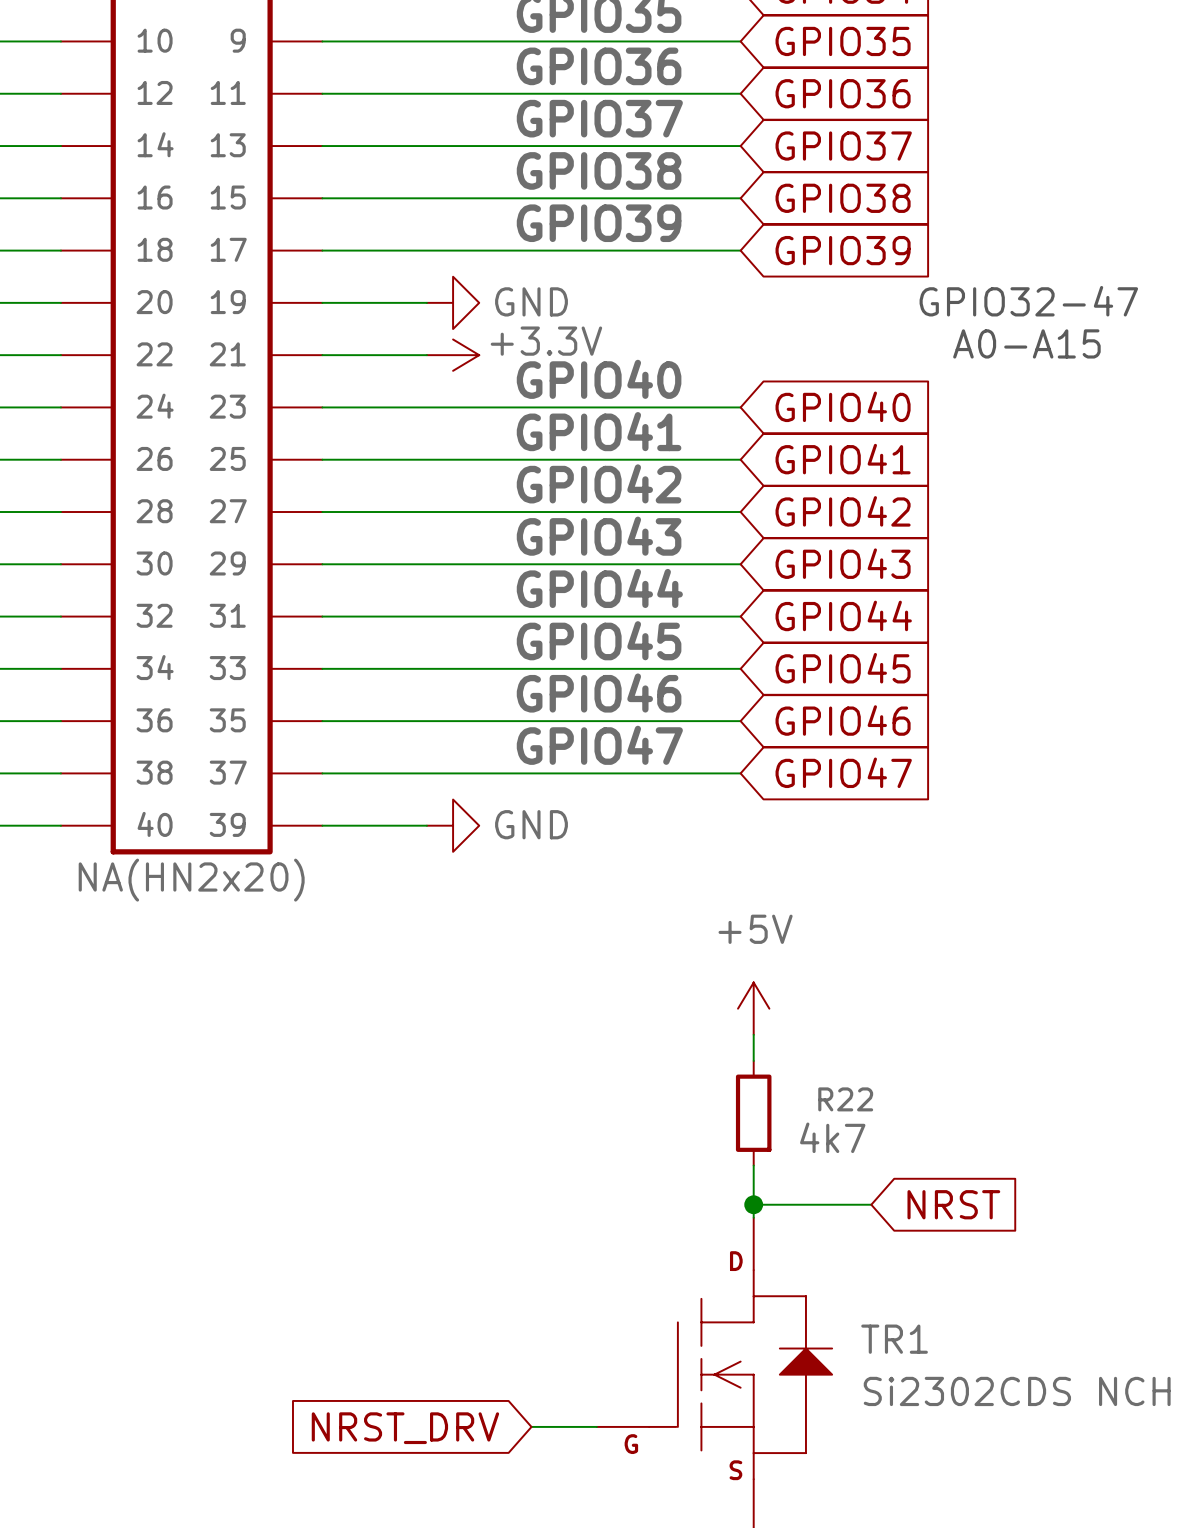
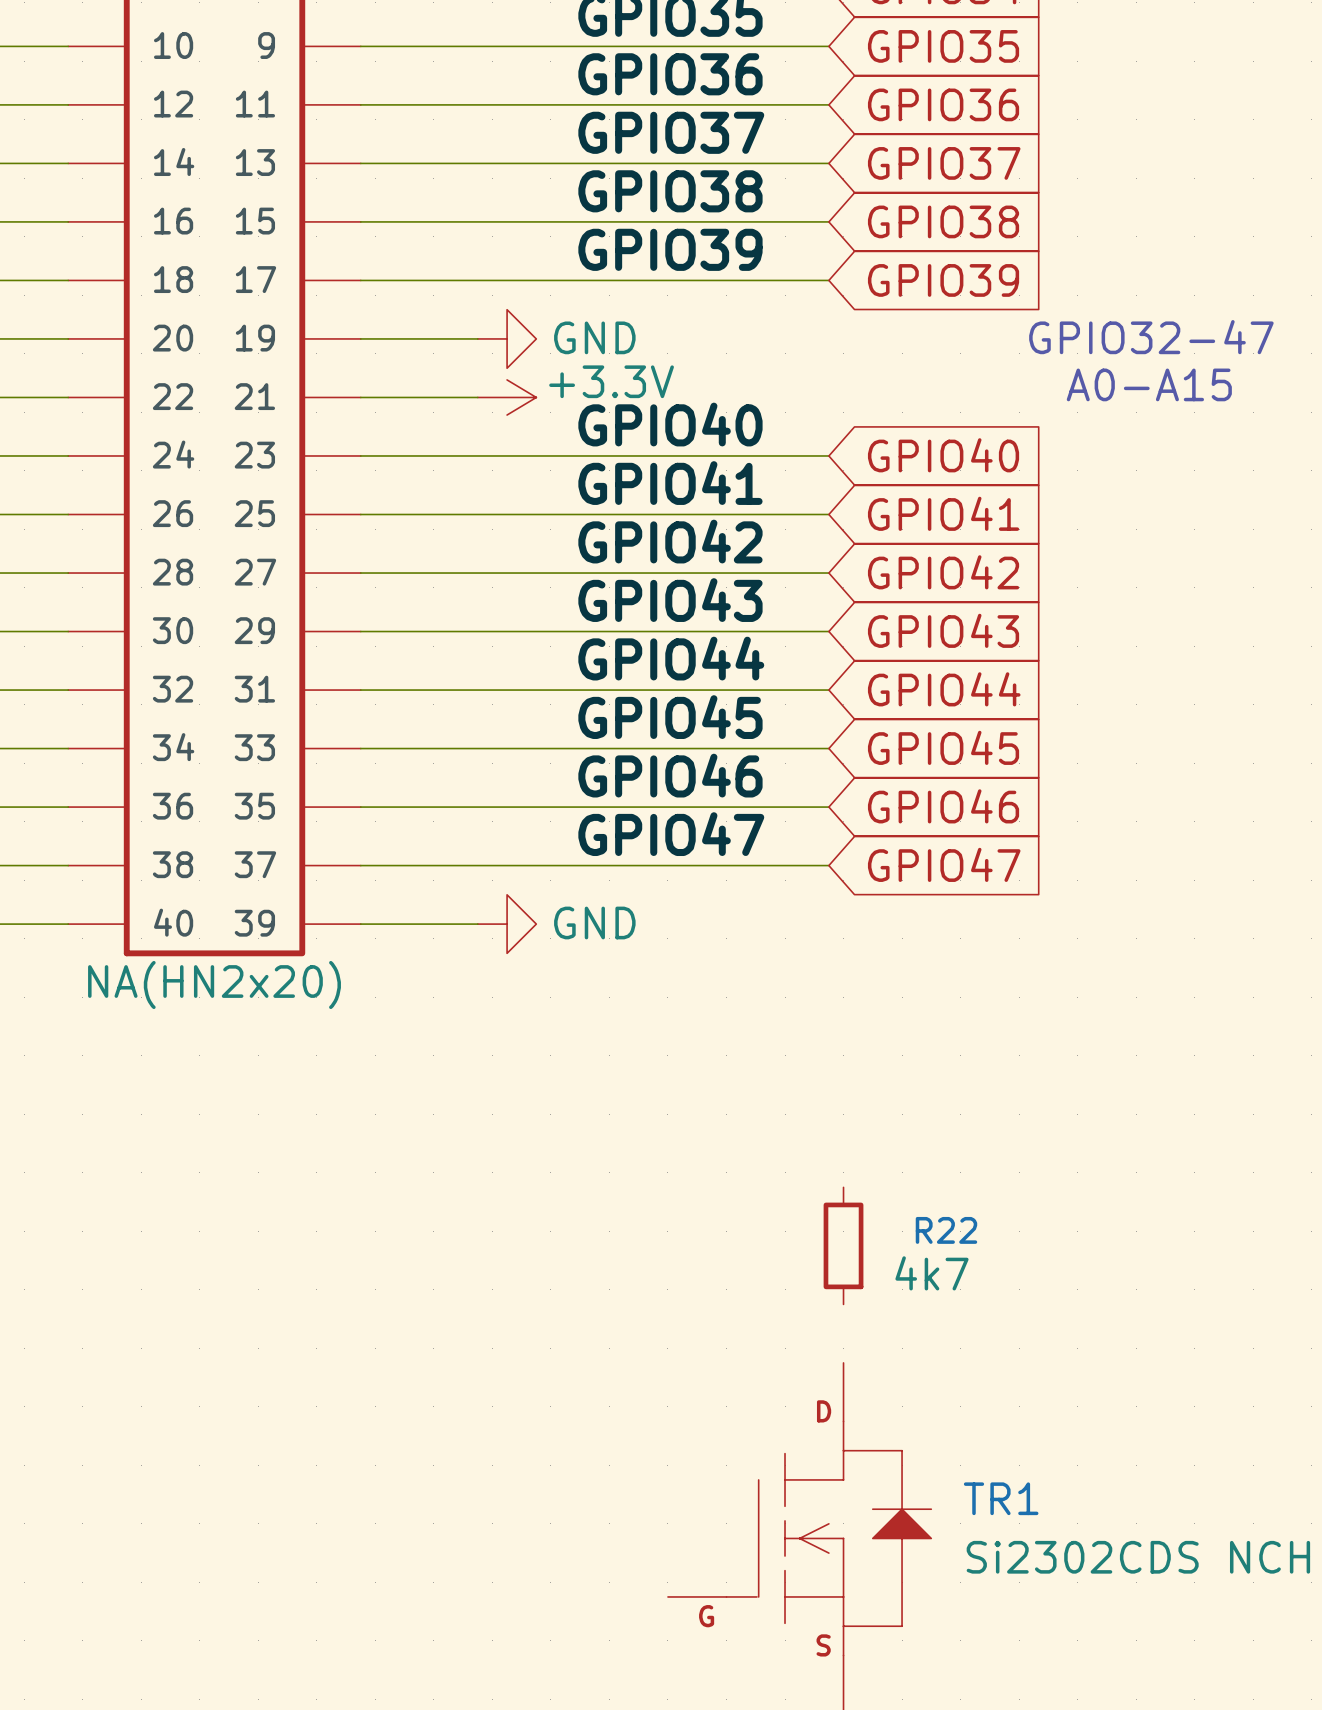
power symbol: +5V (753, 1008) -> none
wire: (753, 1034) (753, 1060) -> none
wire: (753, 1165) (753, 1217) -> none
wire: (753, 1204) (871, 1204) -> none
junction: (753, 1204) -> none
global label: NRST (953, 1204) -> none
wire: (531, 1426) (596, 1426) -> none
global label: NRST_DRV (405, 1428) -> none

